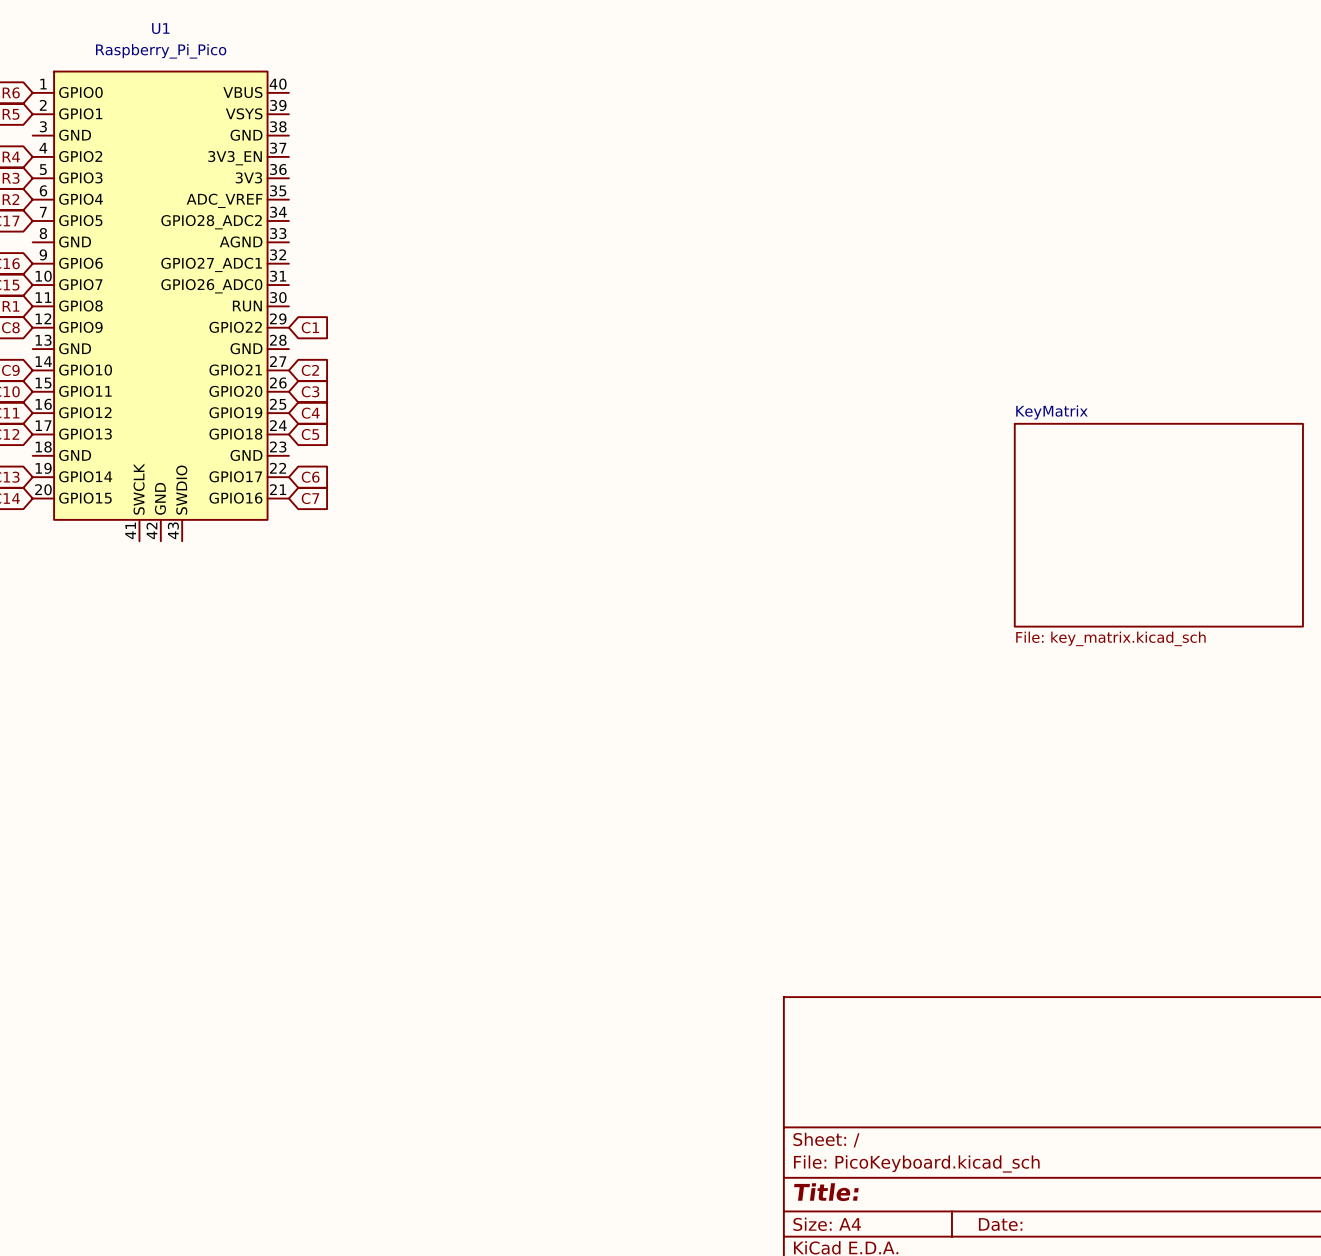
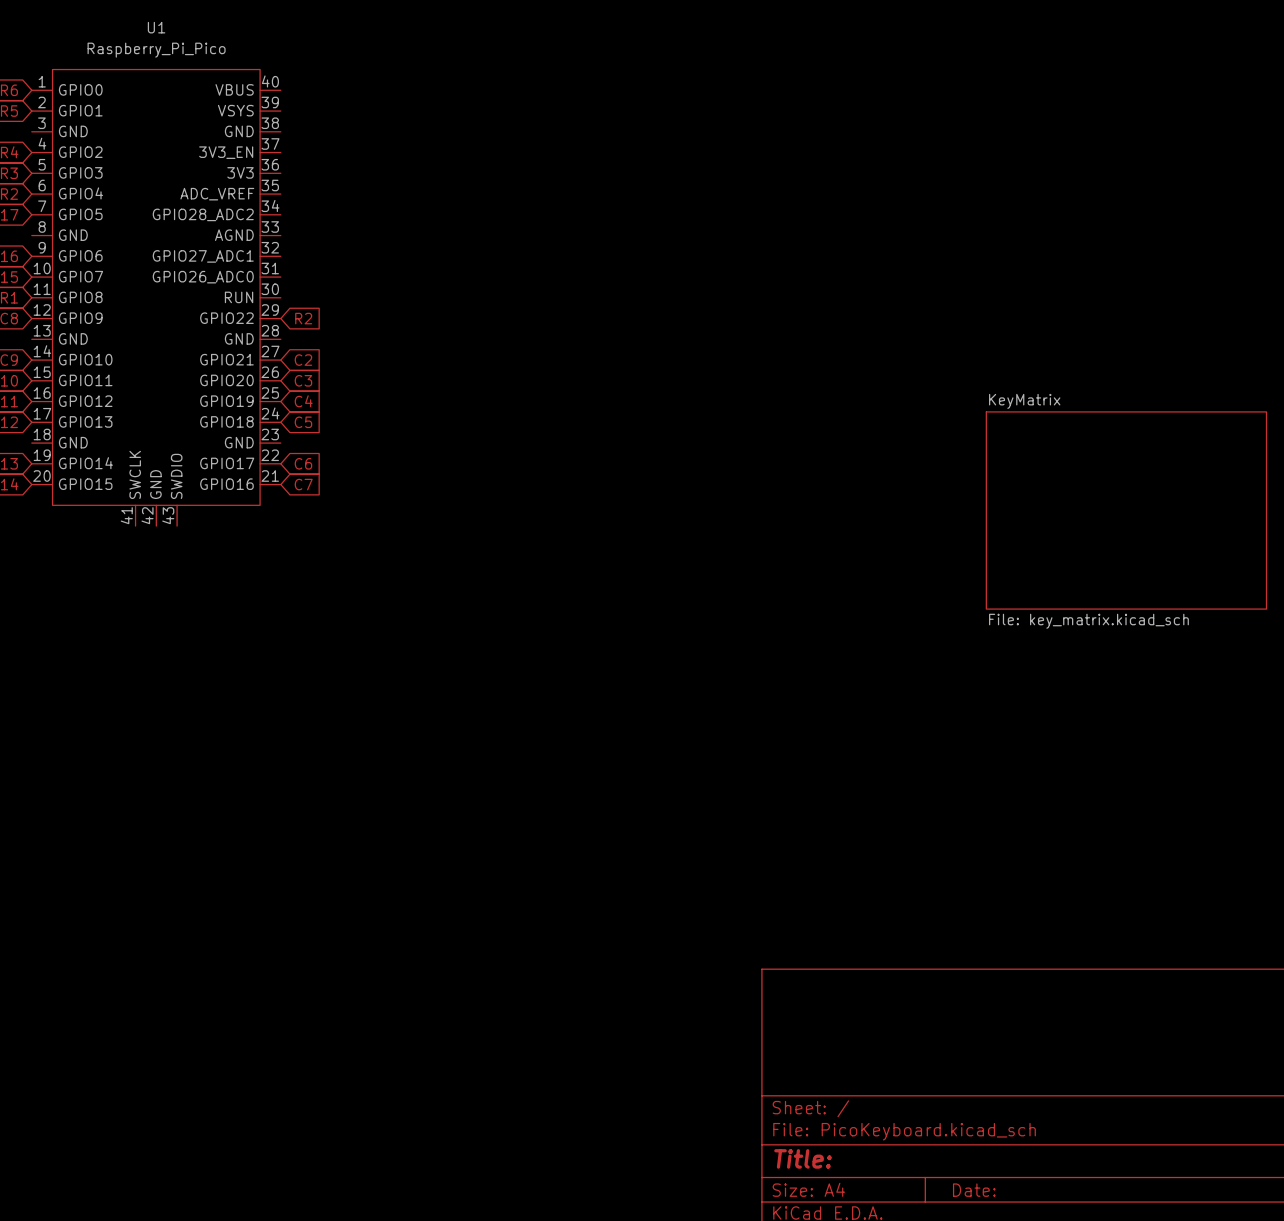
global label: C1 (310, 327) -> R2 (303, 318)

